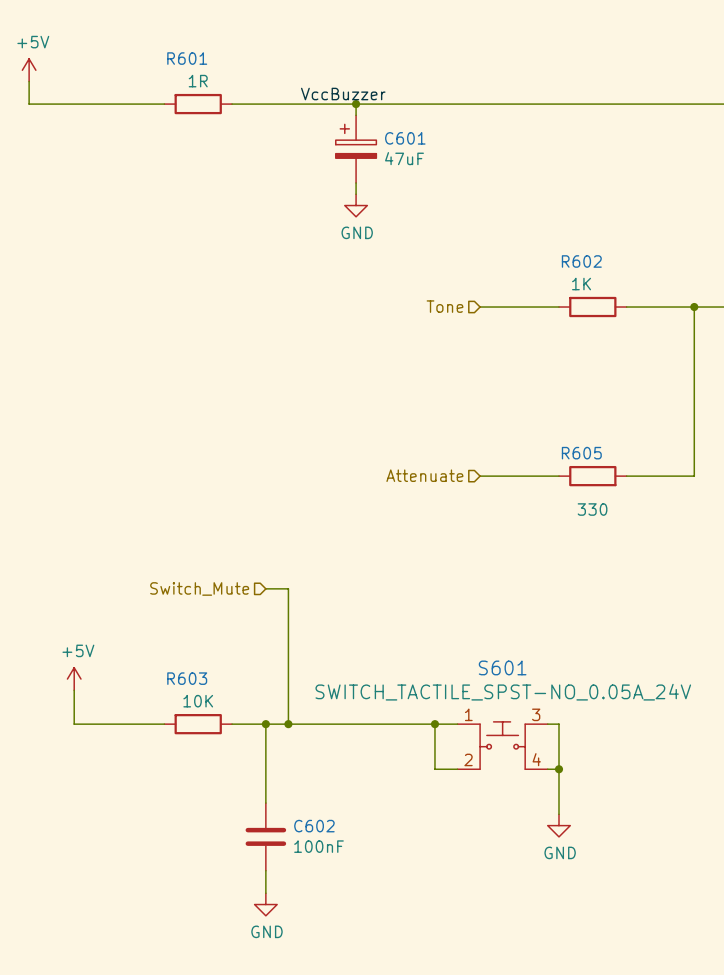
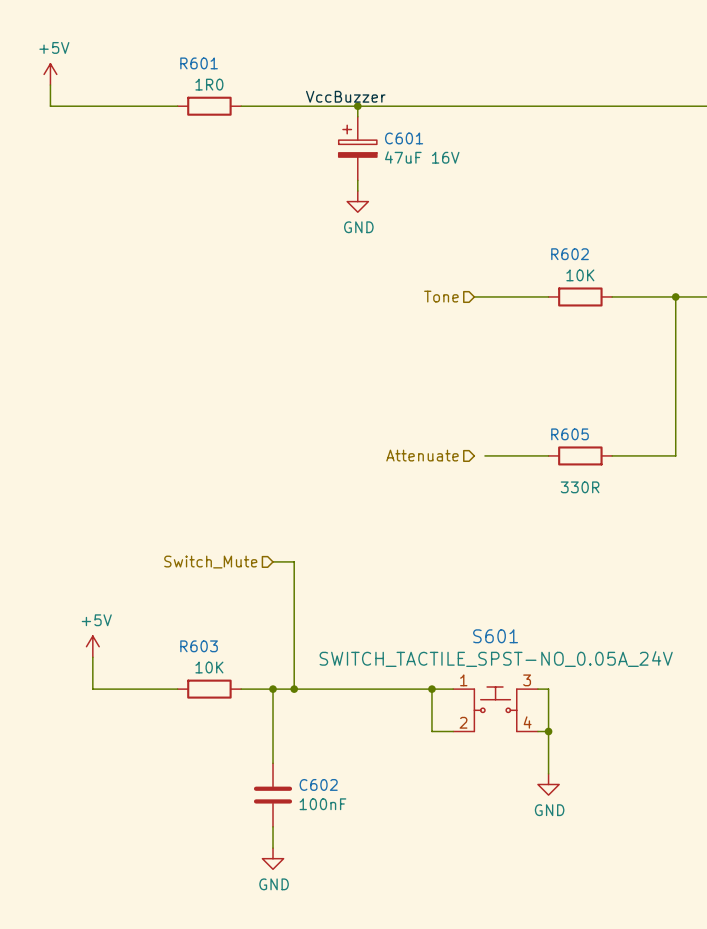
R601 value: 1R (198, 81) -> 1R0 (209, 84)
C601 value: 47uF (404, 158) -> 47uF 16V (422, 157)
R602 value: 1K (581, 284) -> 10K (580, 275)
wire: (480, 476) (491, 476) -> none
R605 value: 330 (592, 509) -> 330R (580, 487)

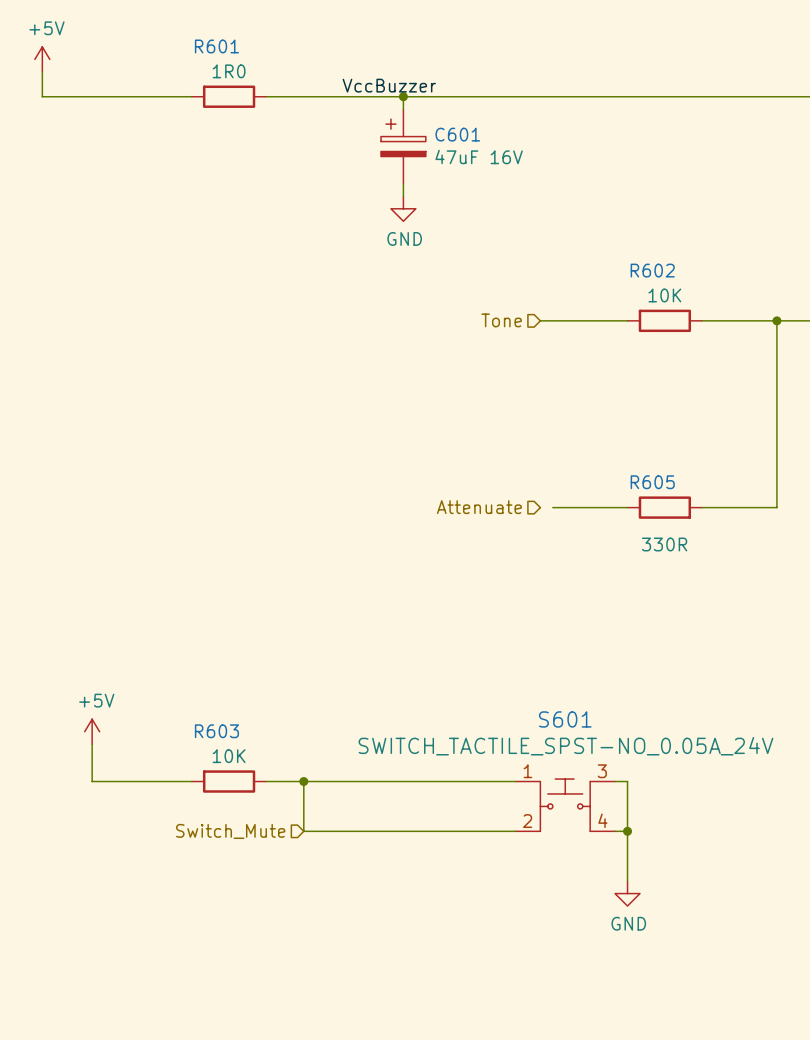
wire: (273, 561) (294, 561) (294, 689) -> none
hierarchical label position: Switch_Mute (210, 562) -> Switch_Mute (230, 831)
junction: (294, 689) -> none
wire: (431, 689) (431, 731) -> none
junction: (431, 689) -> none
wire: (273, 731) (273, 763) -> (303, 831) (490, 831)
C602: 100nF (273, 795) -> none
wire: (273, 826) (273, 848) -> none
power symbol: GND (273, 858) -> none

